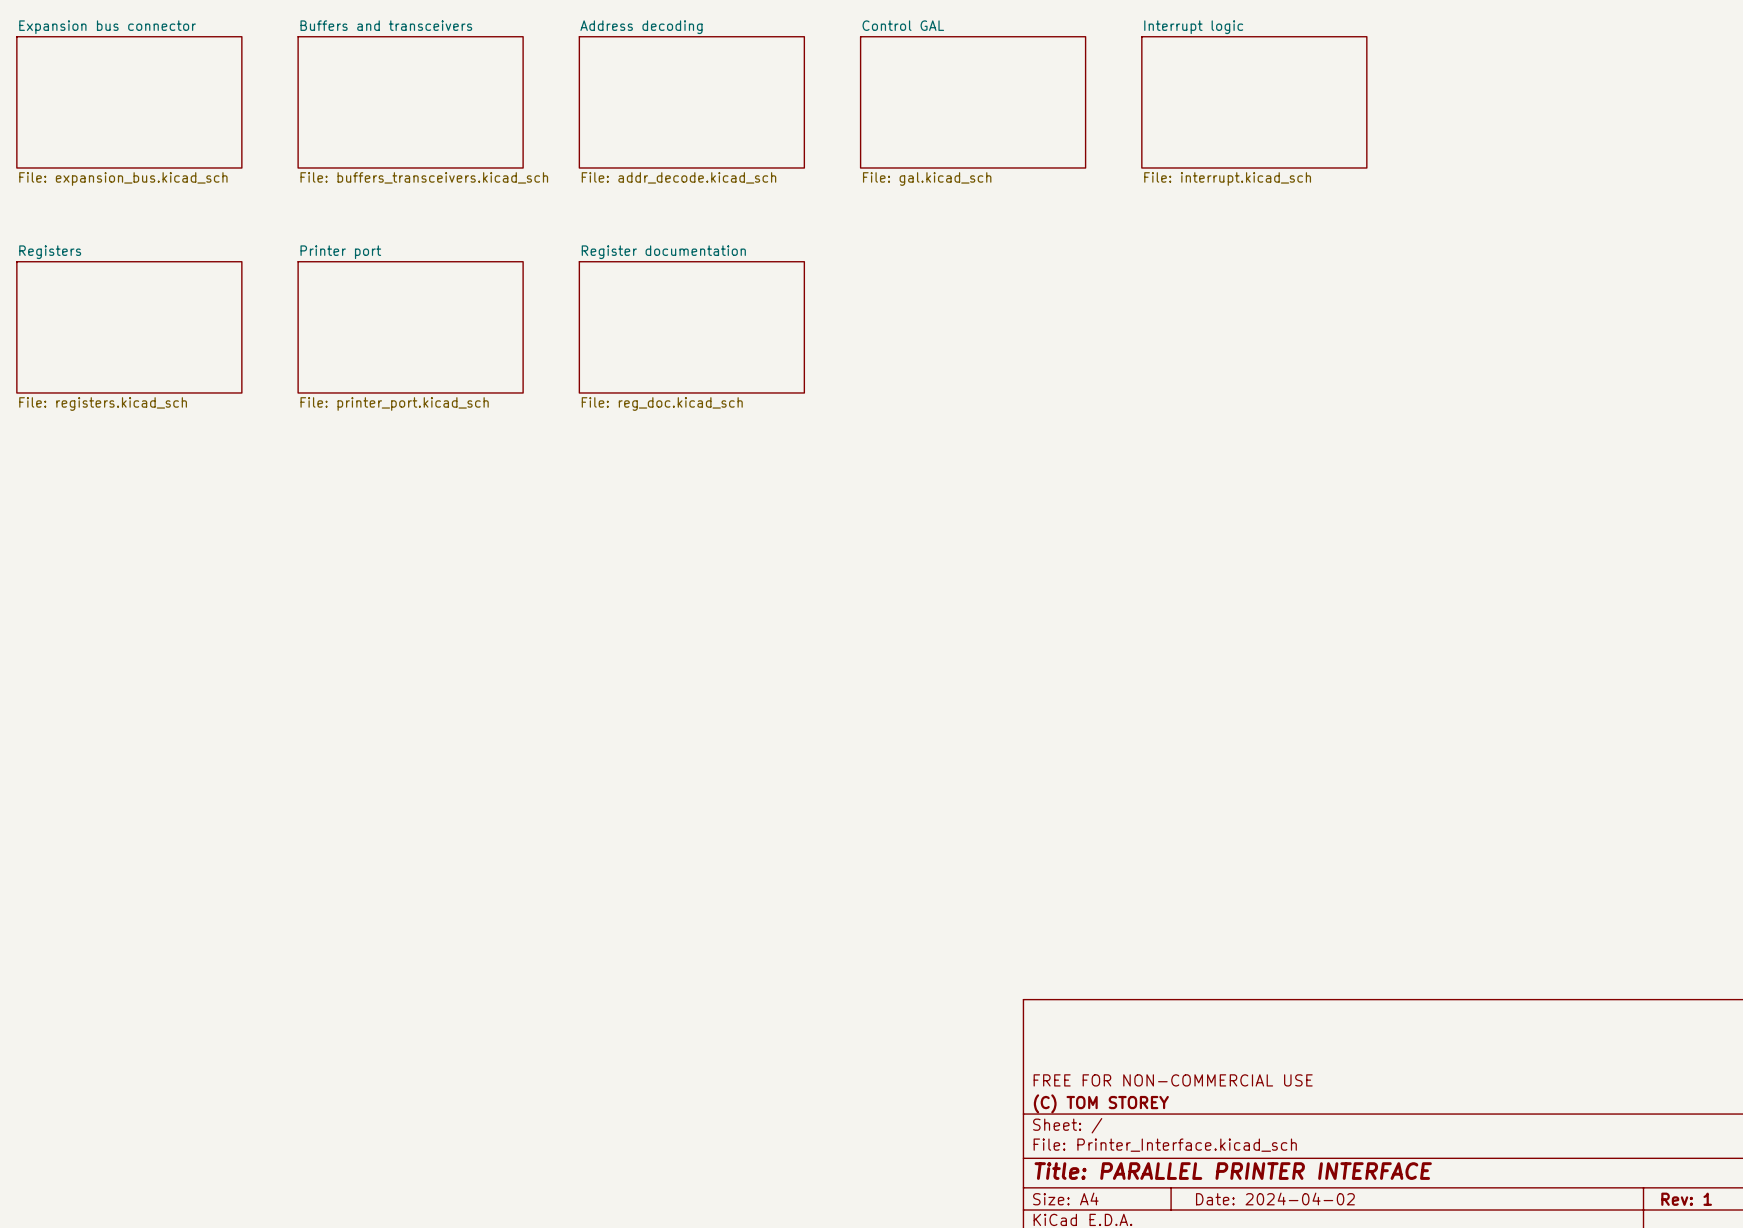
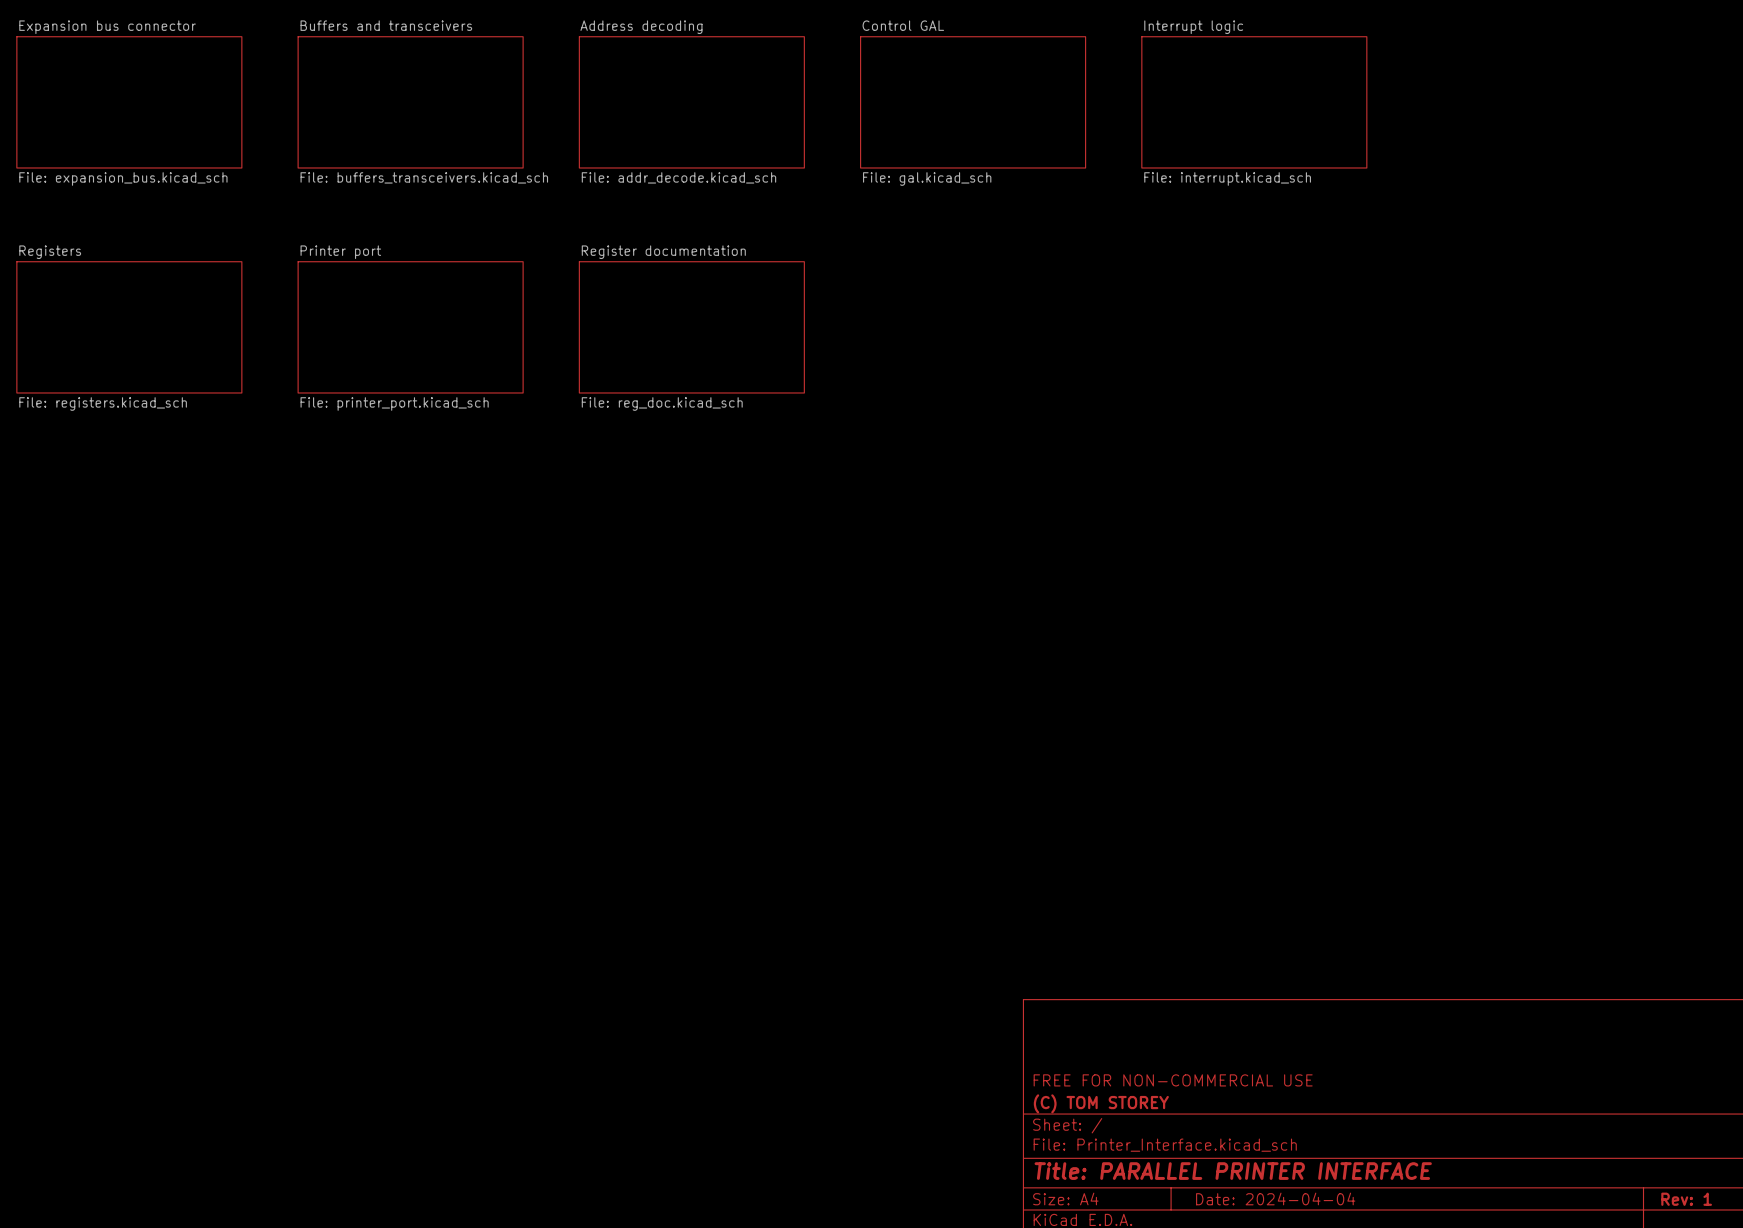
title block: Date: 2024-04-02 (1275, 1198) -> Date: 2024-04-04 (1275, 1198)

